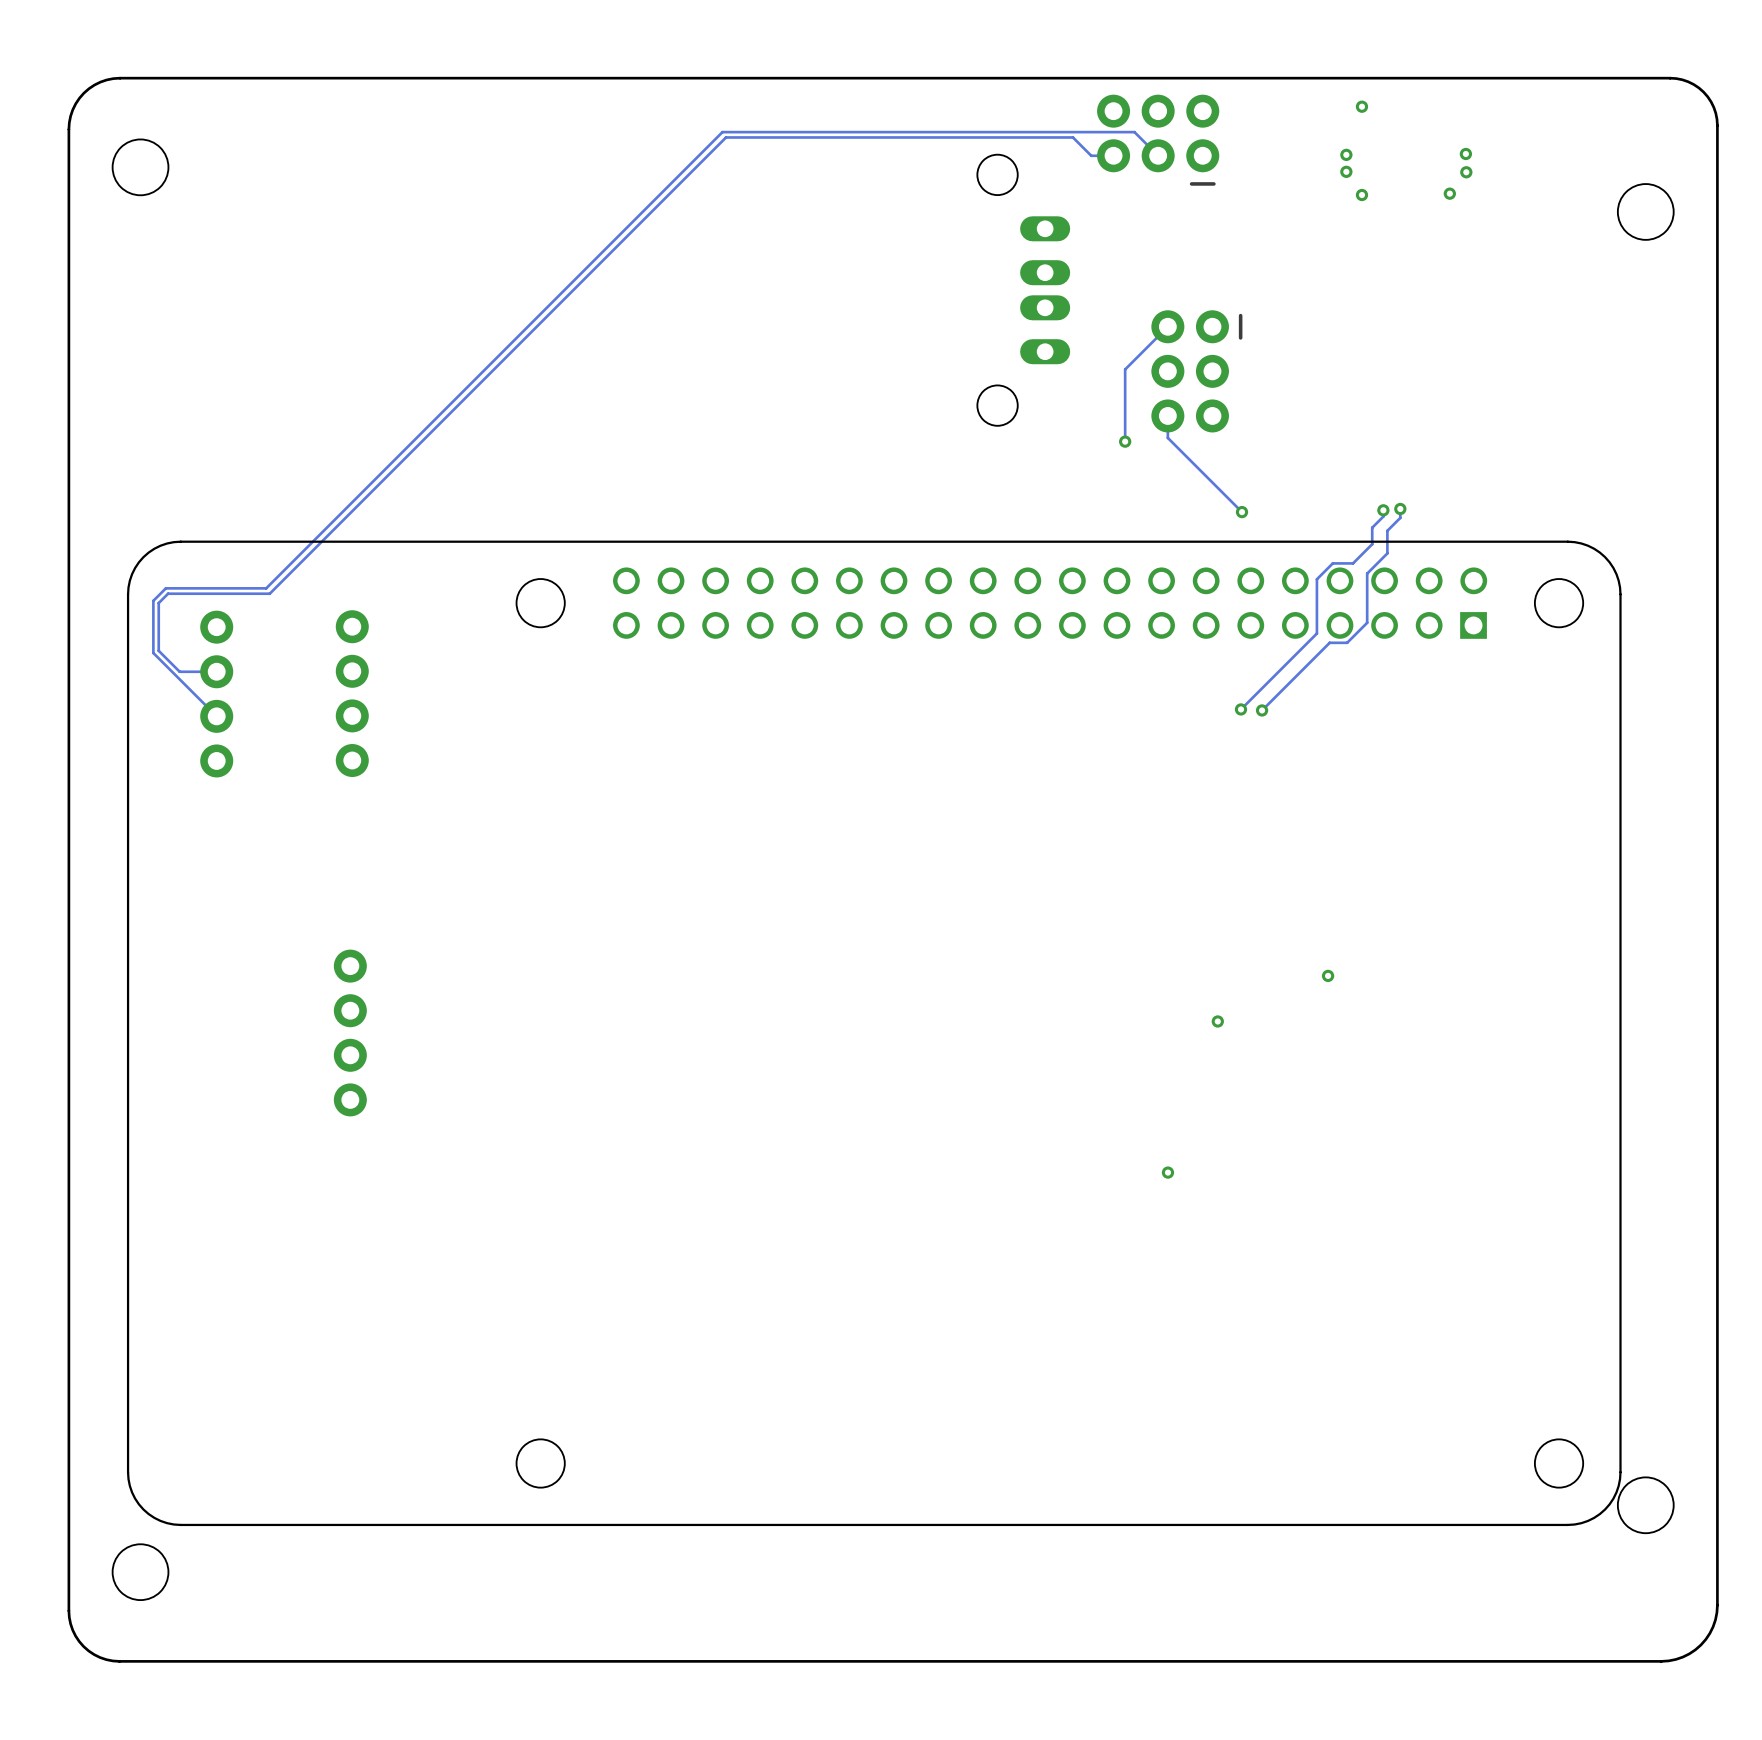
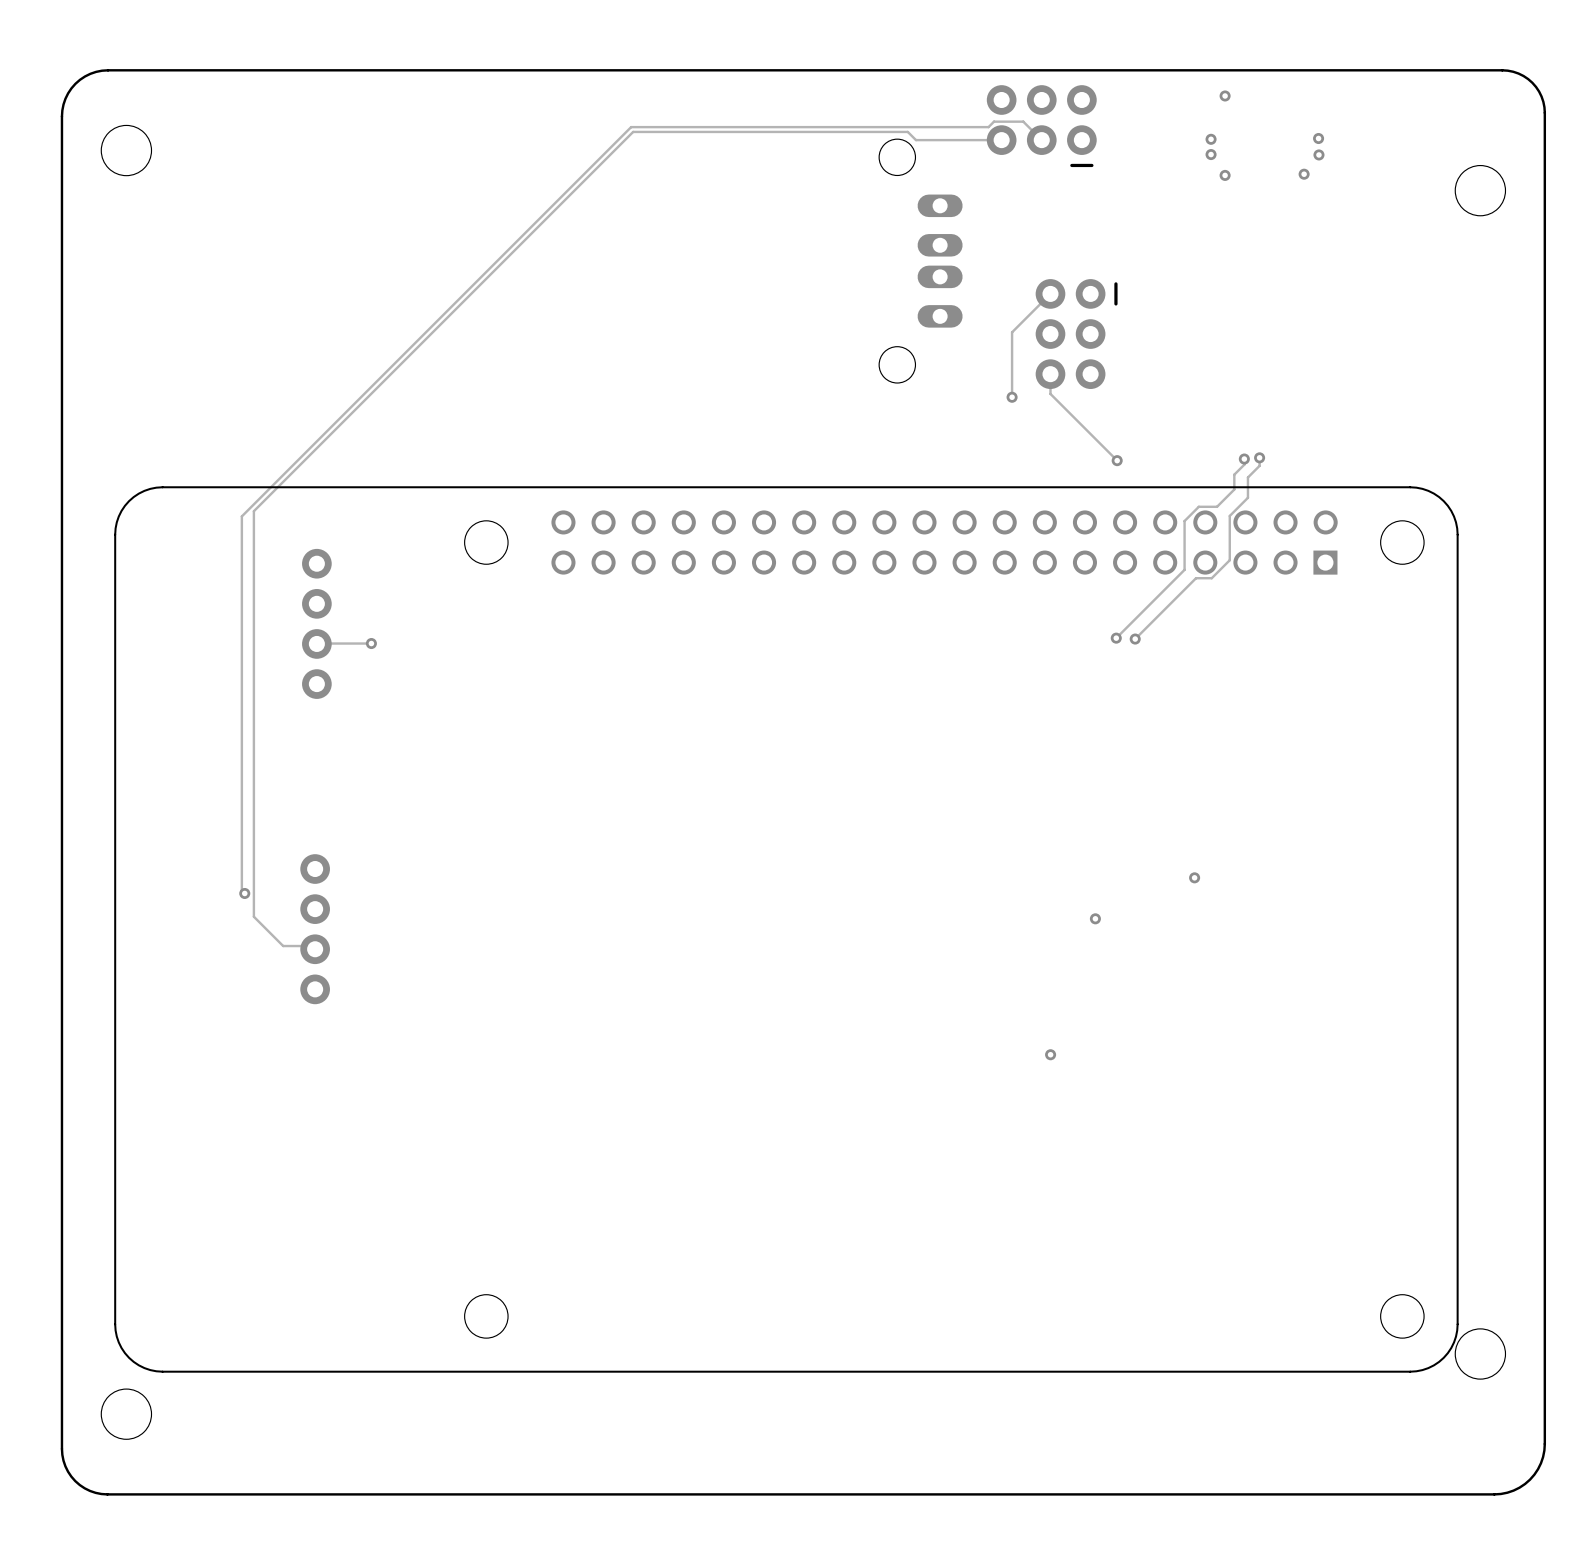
track: (1137, 135) (1134, 132) (722, 132) (266, 588) (165, 588) (153, 600) (153, 653) (216, 716) -> (1023, 121) (994, 121) (988, 127) (631, 127) (241, 516) (241, 890) (244, 893)
track: (1091, 155) (1072, 137) (726, 137) (269, 593) (168, 593) (158, 603) (158, 650) (179, 671) (216, 671) -> (981, 140) (915, 140) (907, 131) (633, 131) (253, 511) (253, 916) (283, 946) (316, 946)
part: (216, 694) -> none
track: none -> (371, 643) (315, 643)
via: none -> (371, 643)
via: none -> (244, 893)

